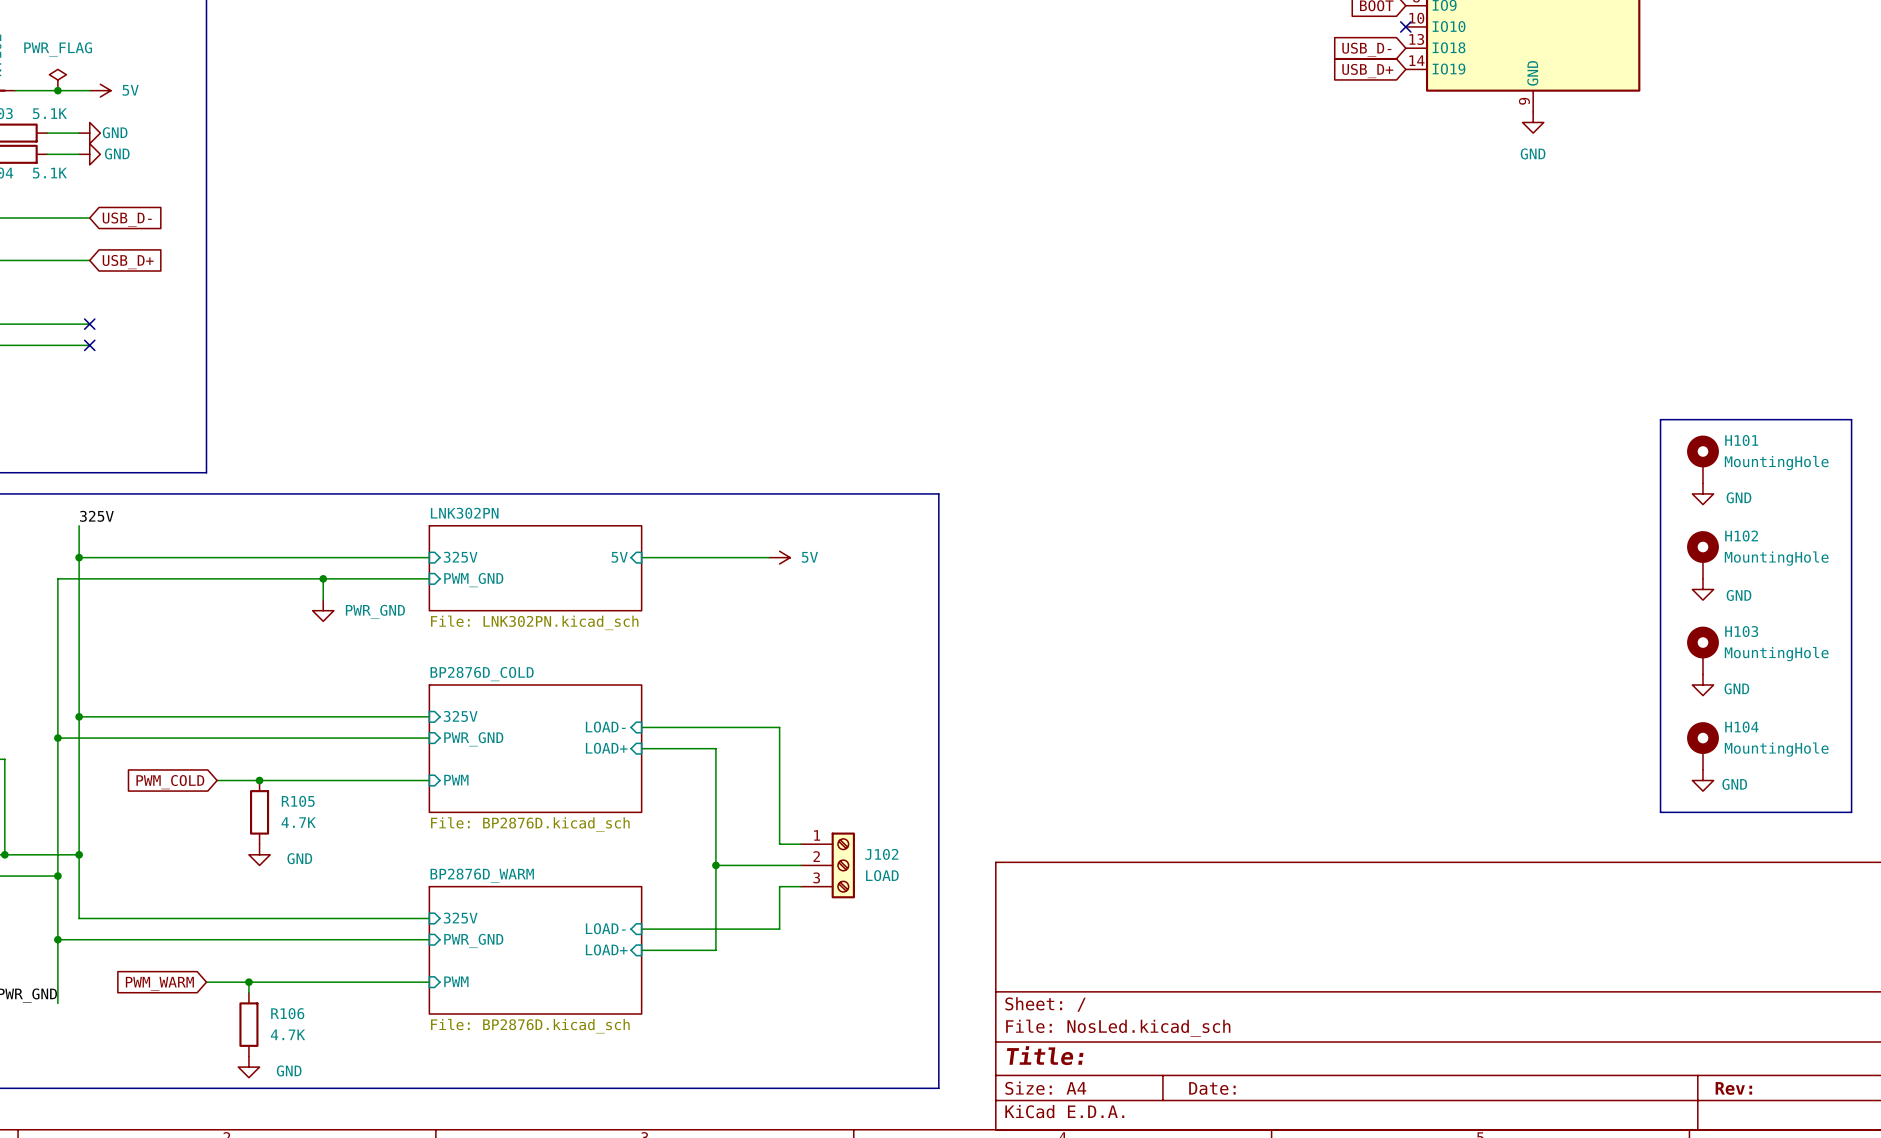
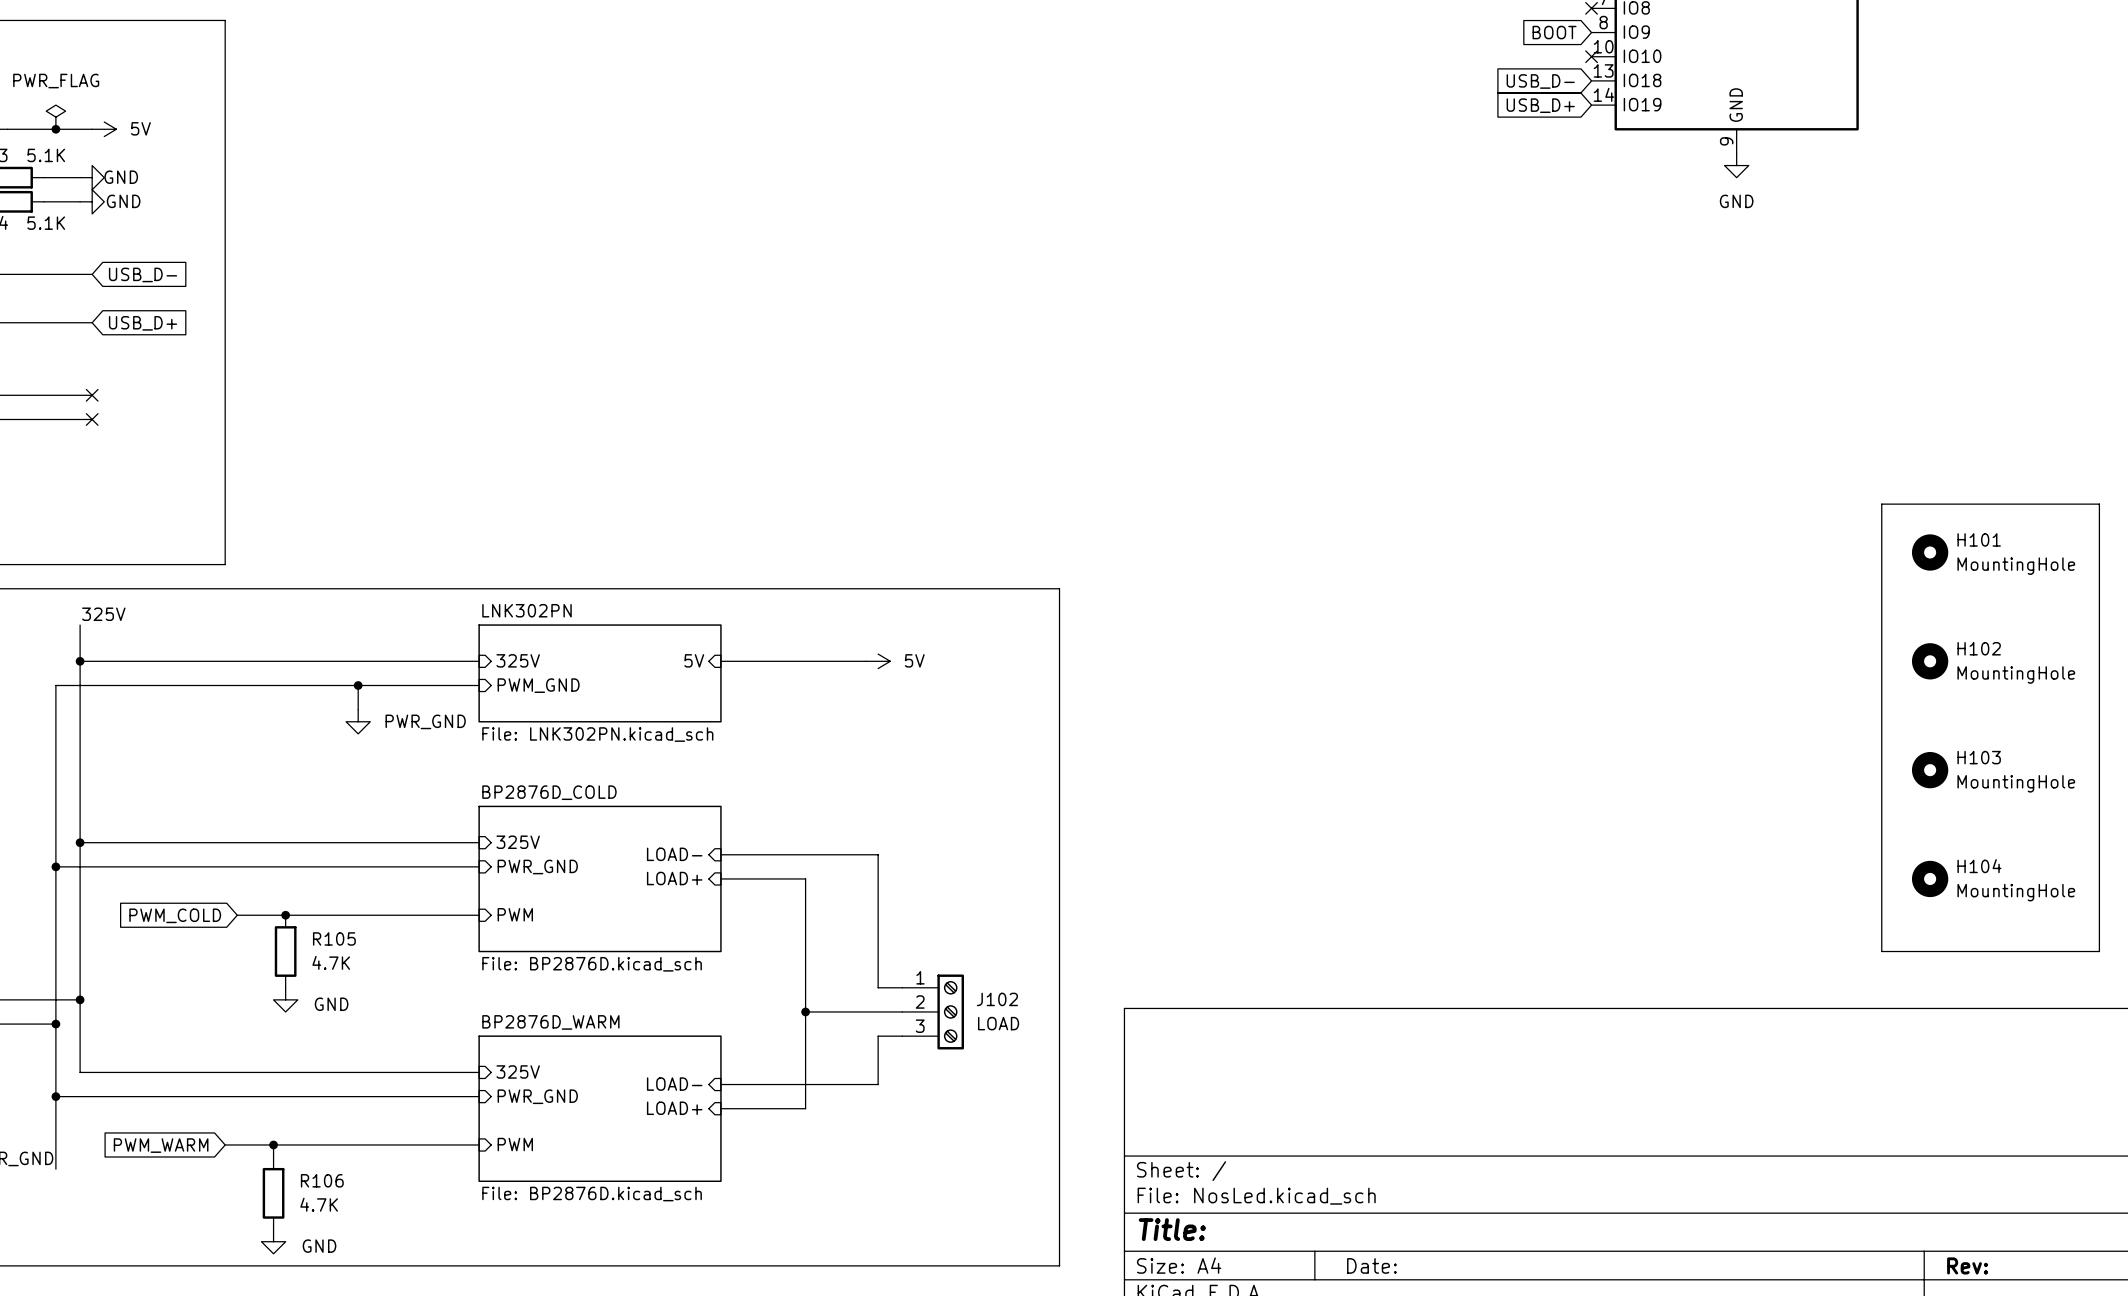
H101 symbol: [1687, 435, 1719, 484] -> [1911, 534, 1949, 571]
power symbol: GND (1702, 493) -> none
H102 symbol: [1687, 531, 1719, 579] -> [1911, 643, 1949, 680]
power symbol: GND (1702, 589) -> none
H103 symbol: [1687, 626, 1719, 675] -> [1911, 752, 1949, 789]
power symbol: GND (1702, 685) -> none
H104 symbol: [1687, 722, 1719, 770] -> [1911, 860, 1949, 898]
power symbol: GND (1702, 780) -> none

